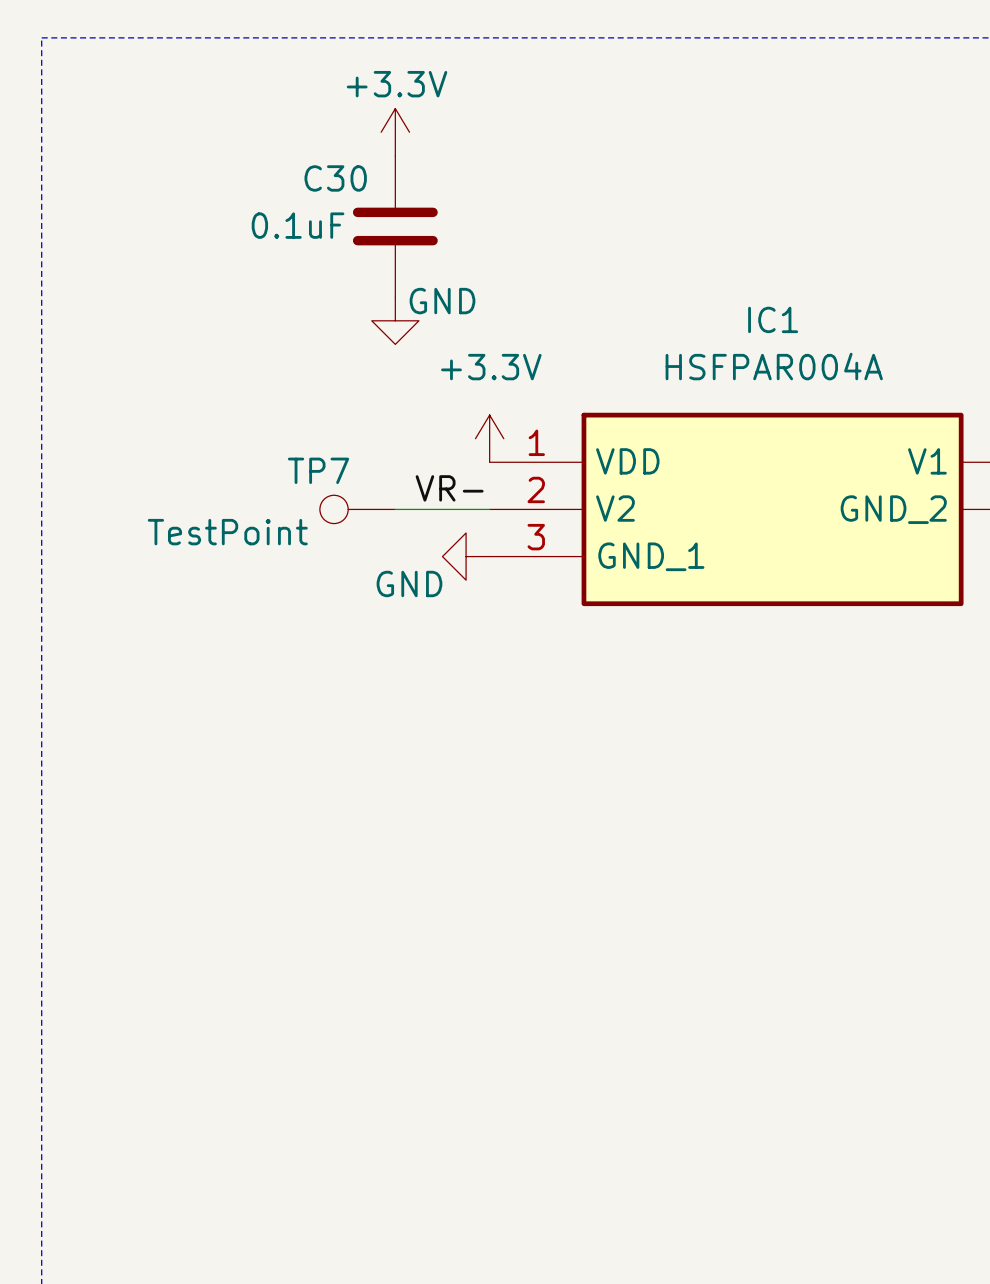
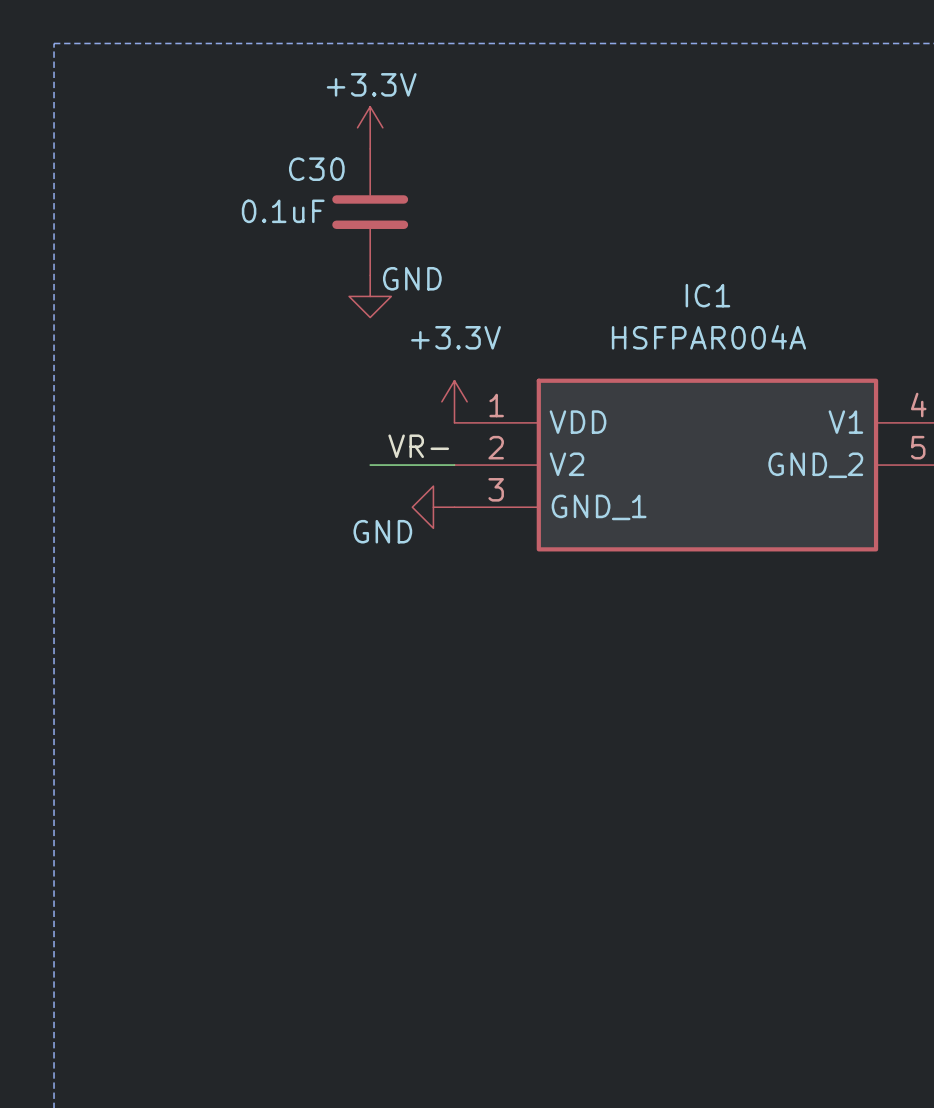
TP7: TestPoint (357, 509) -> none

